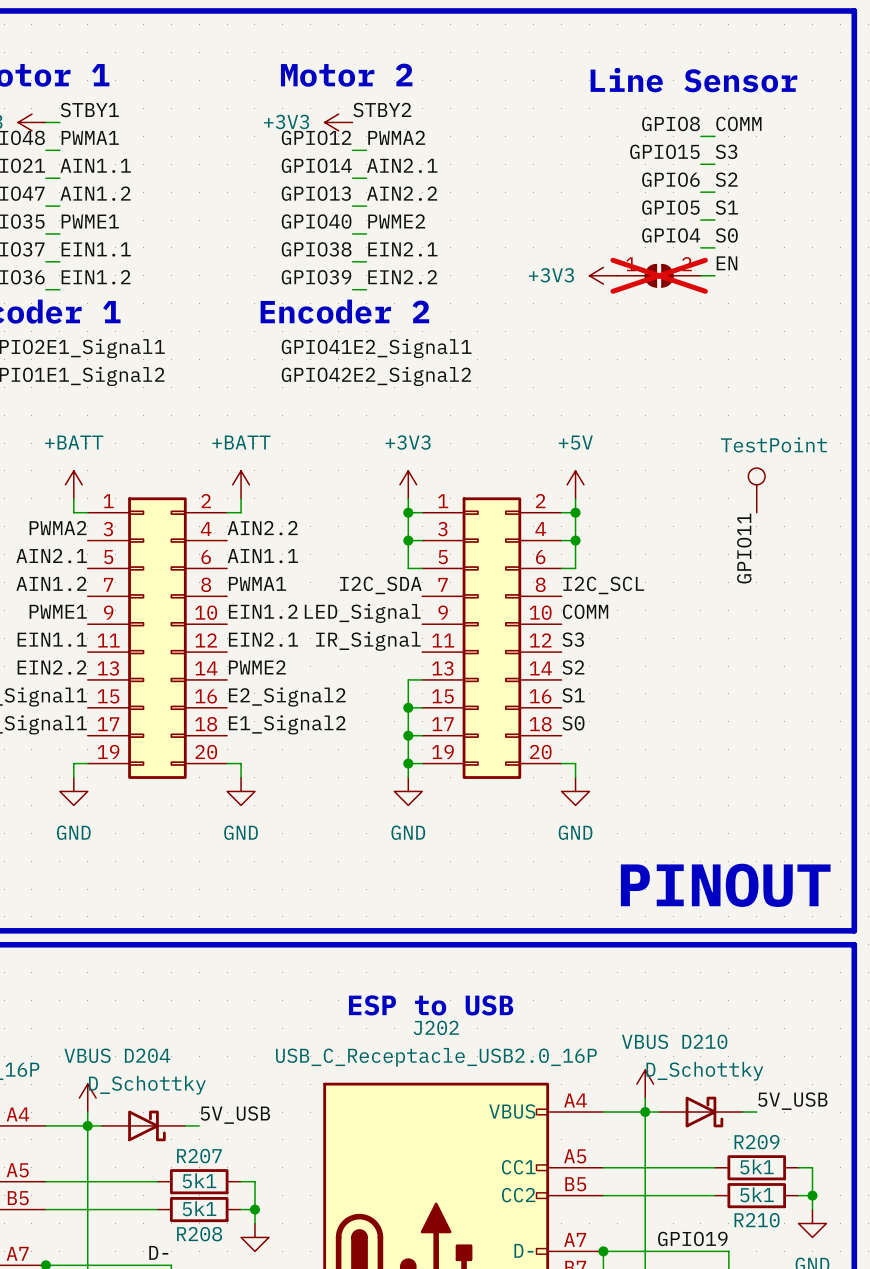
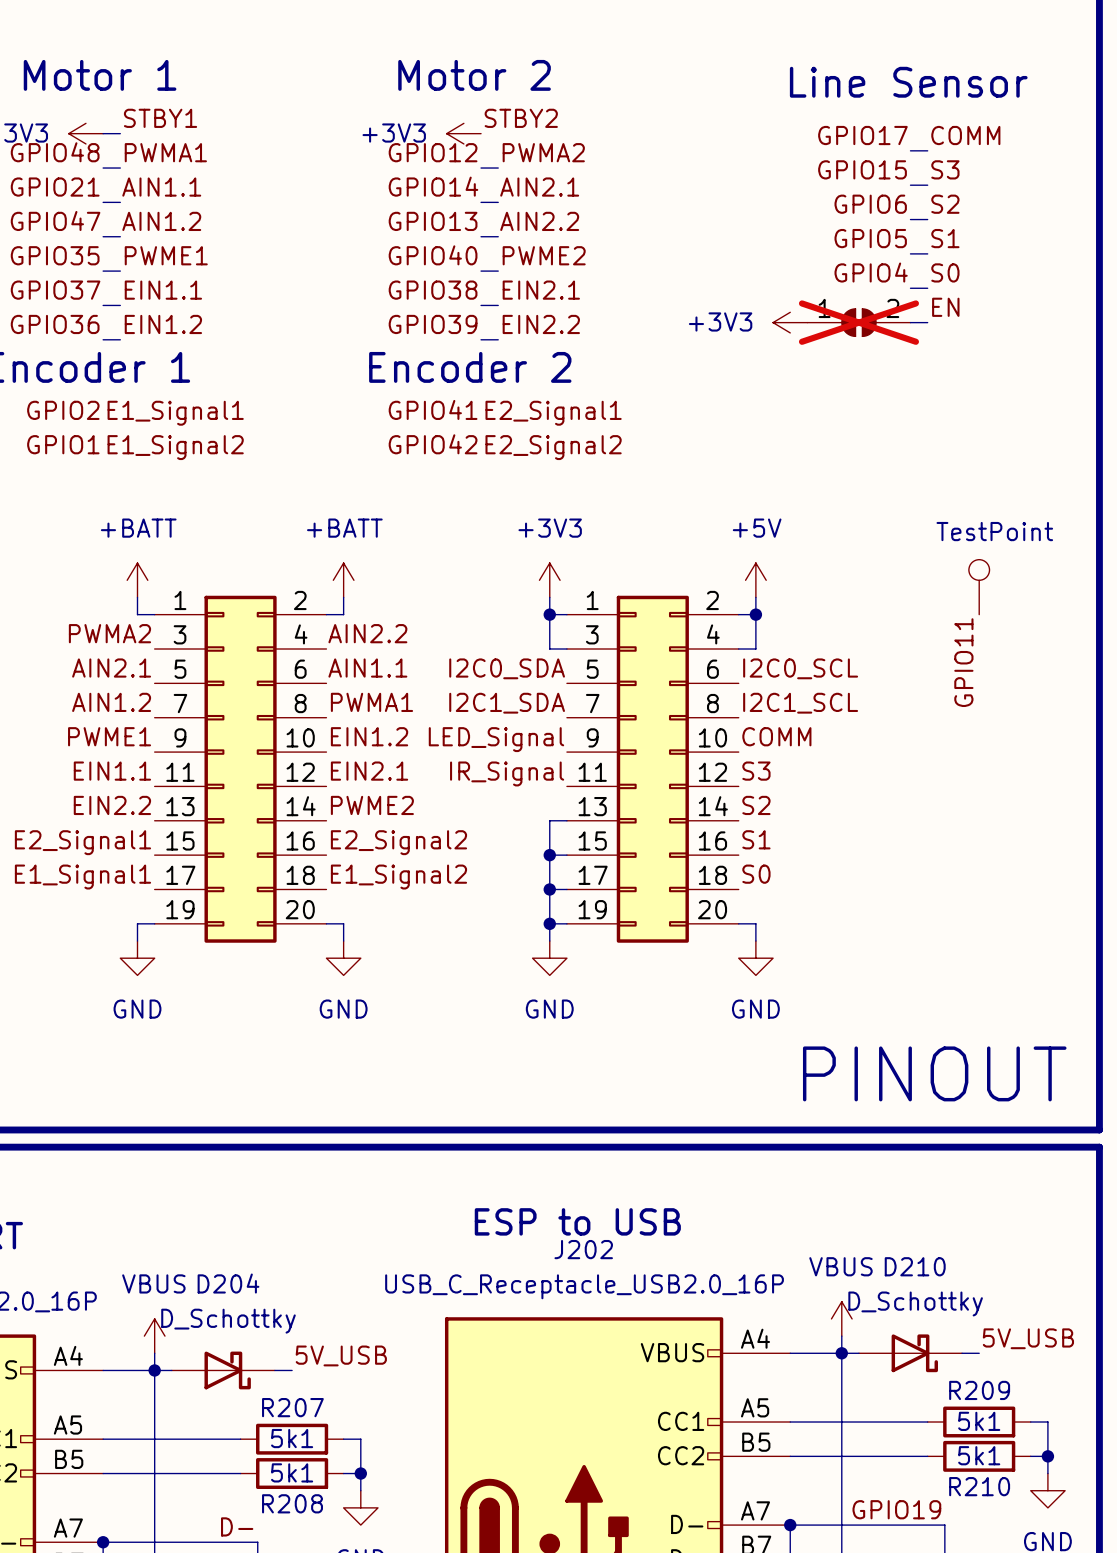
label: GPIO8 (671, 123) -> GPIO17 (862, 135)
wire: (408, 540) (408, 568) (422, 568) -> none
junction: (408, 540) -> none
wire: (575, 540) (575, 568) (561, 568) -> none
junction: (575, 540) -> none
label: none -> I2C0_SDA (507, 668)
label: none -> I2C0_SCL (800, 668)
label: I2C_SDA (380, 585) -> I2C1_SDA (507, 703)
label: I2C_SCL (603, 585) -> I2C1_SCL (800, 703)

